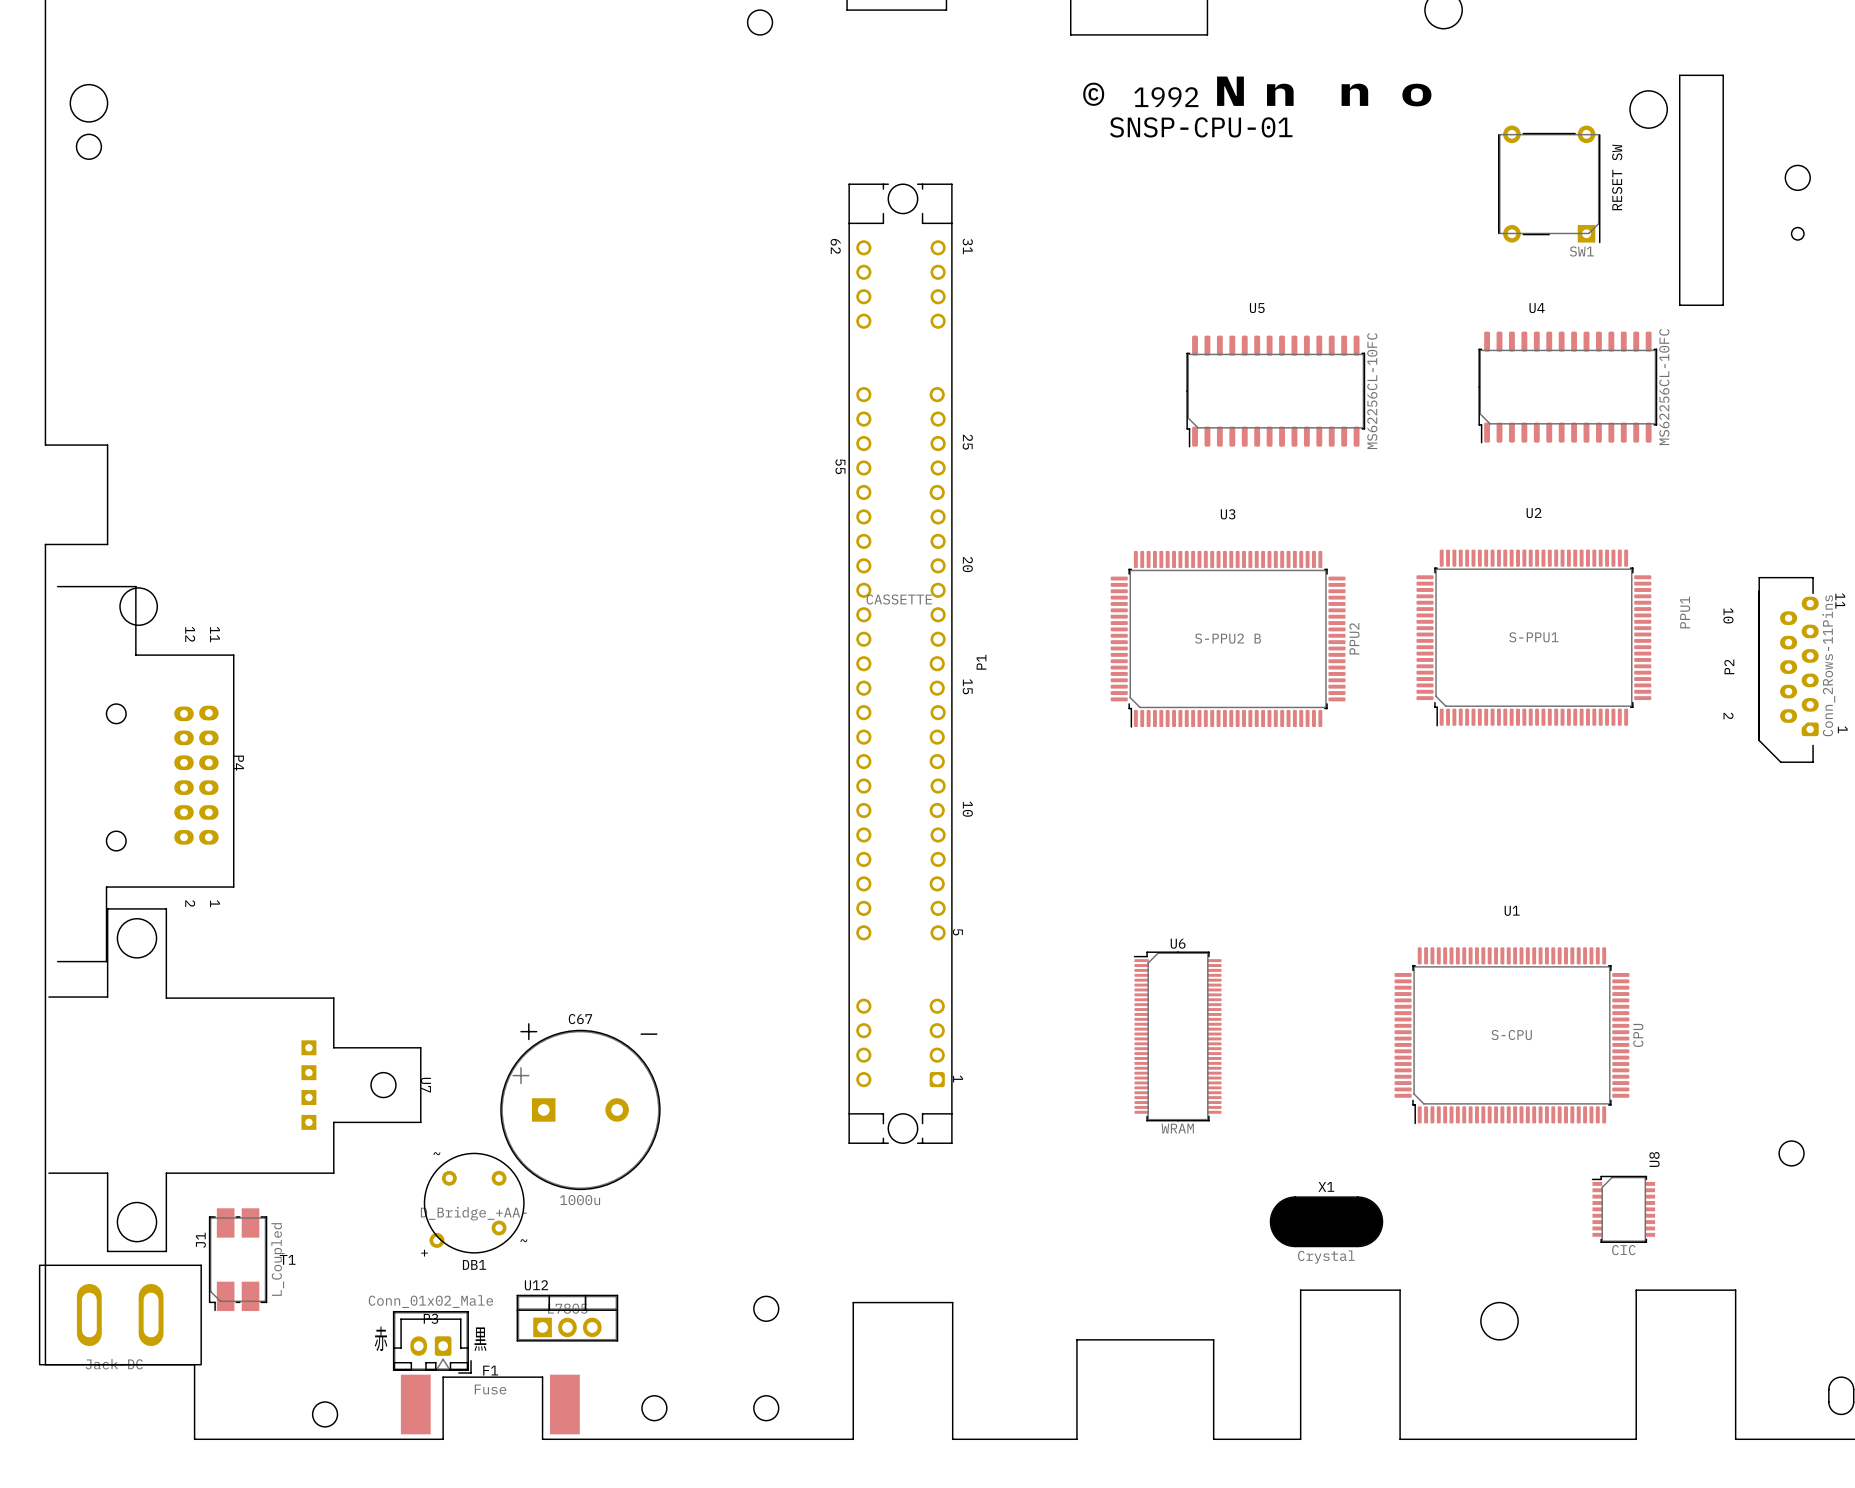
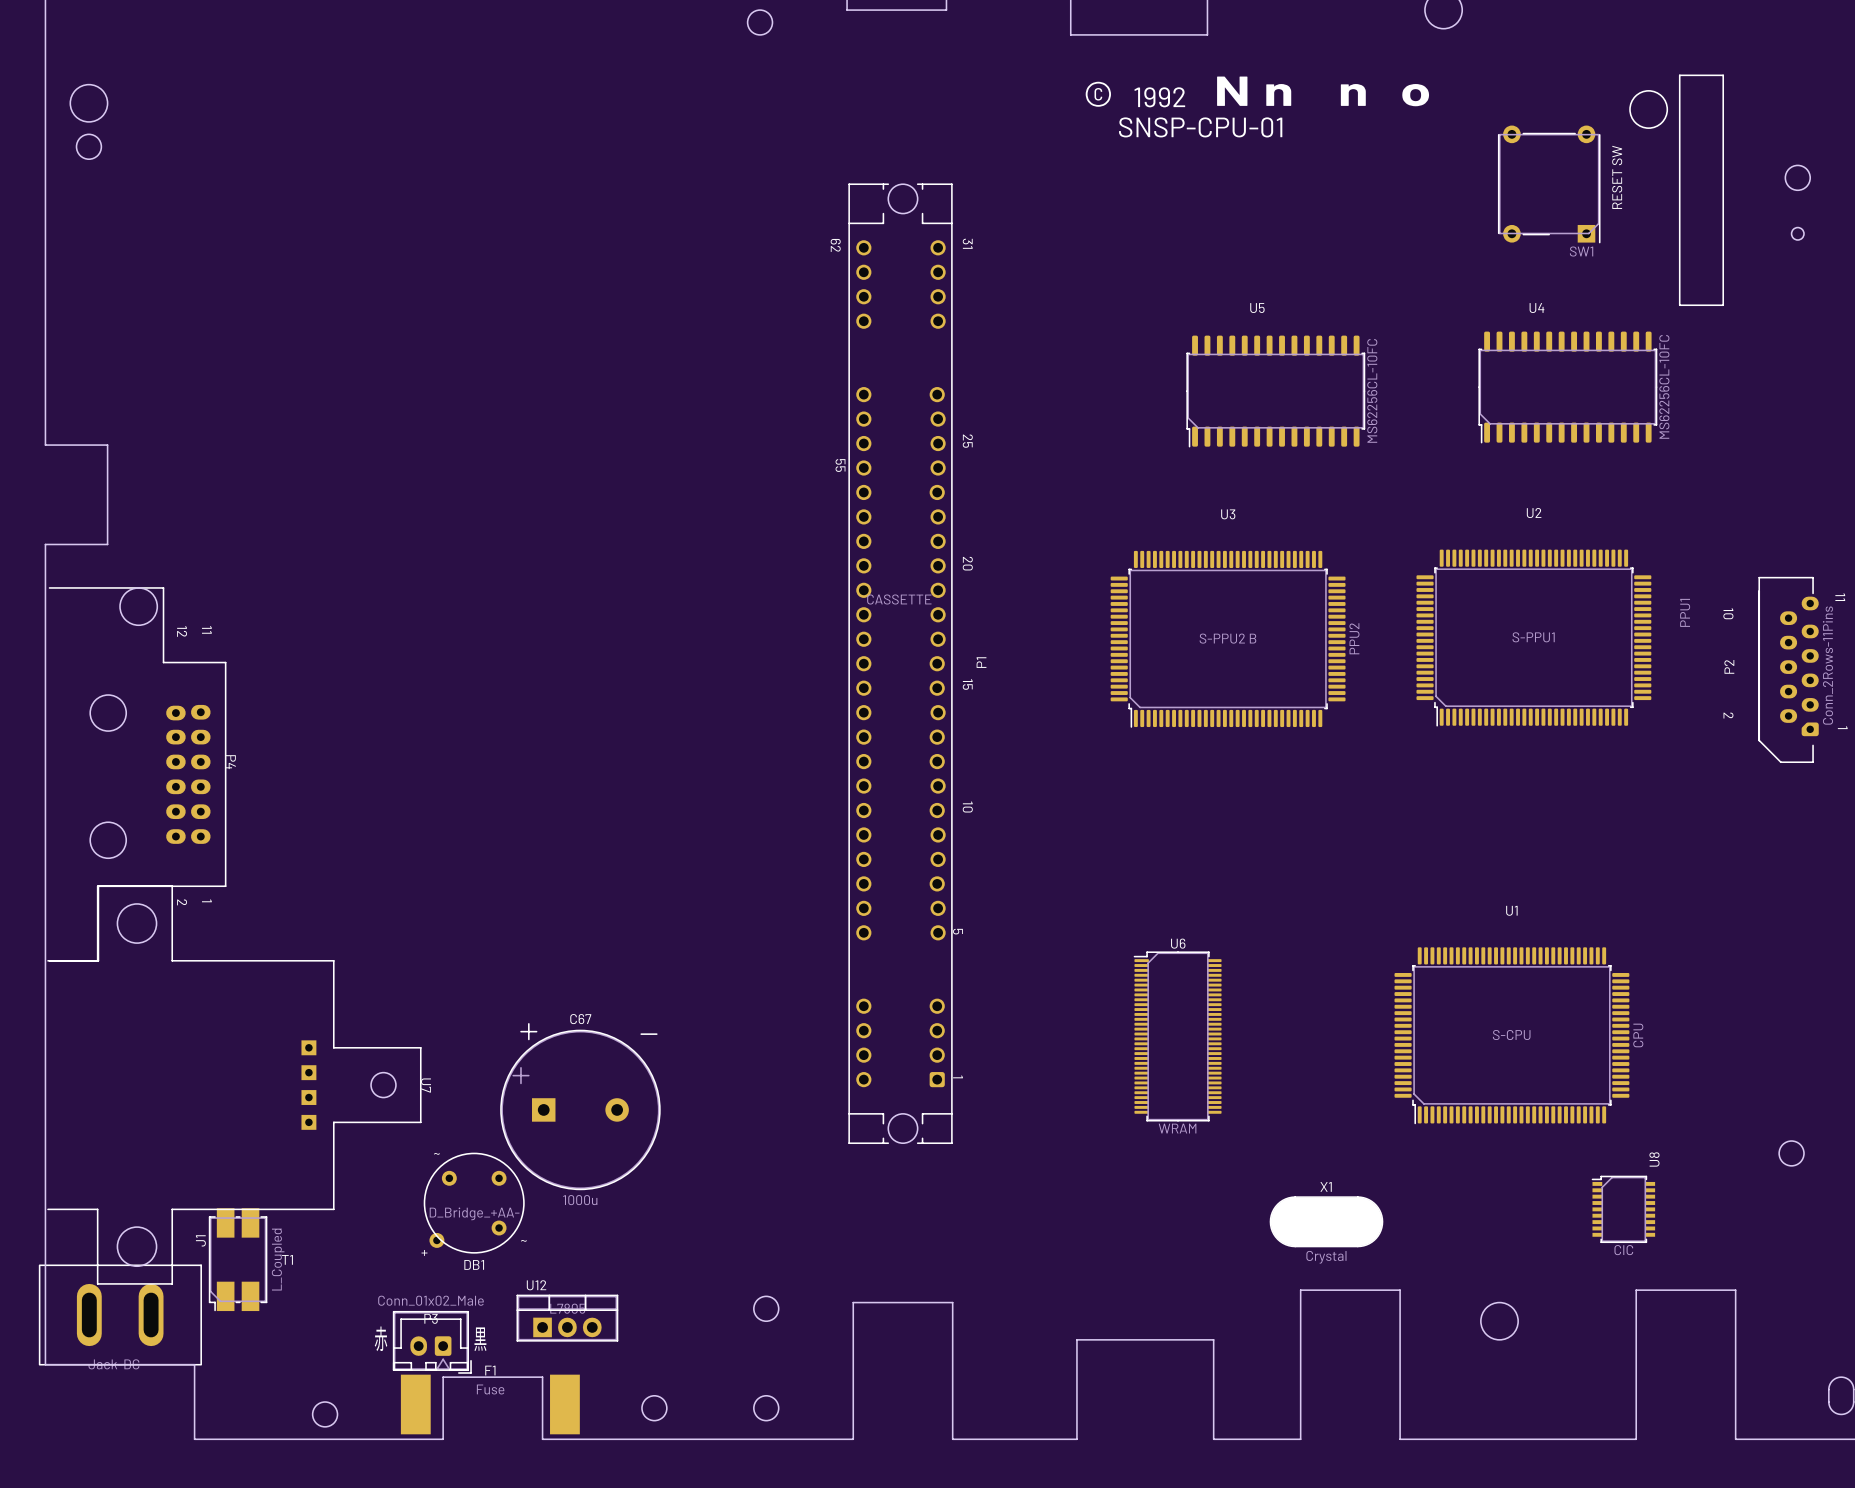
P4 footprint: [57, 586, 235, 963] -> [49, 587, 227, 962]
U7 footprint: [48, 908, 422, 1252] -> [47, 885, 422, 1285]

